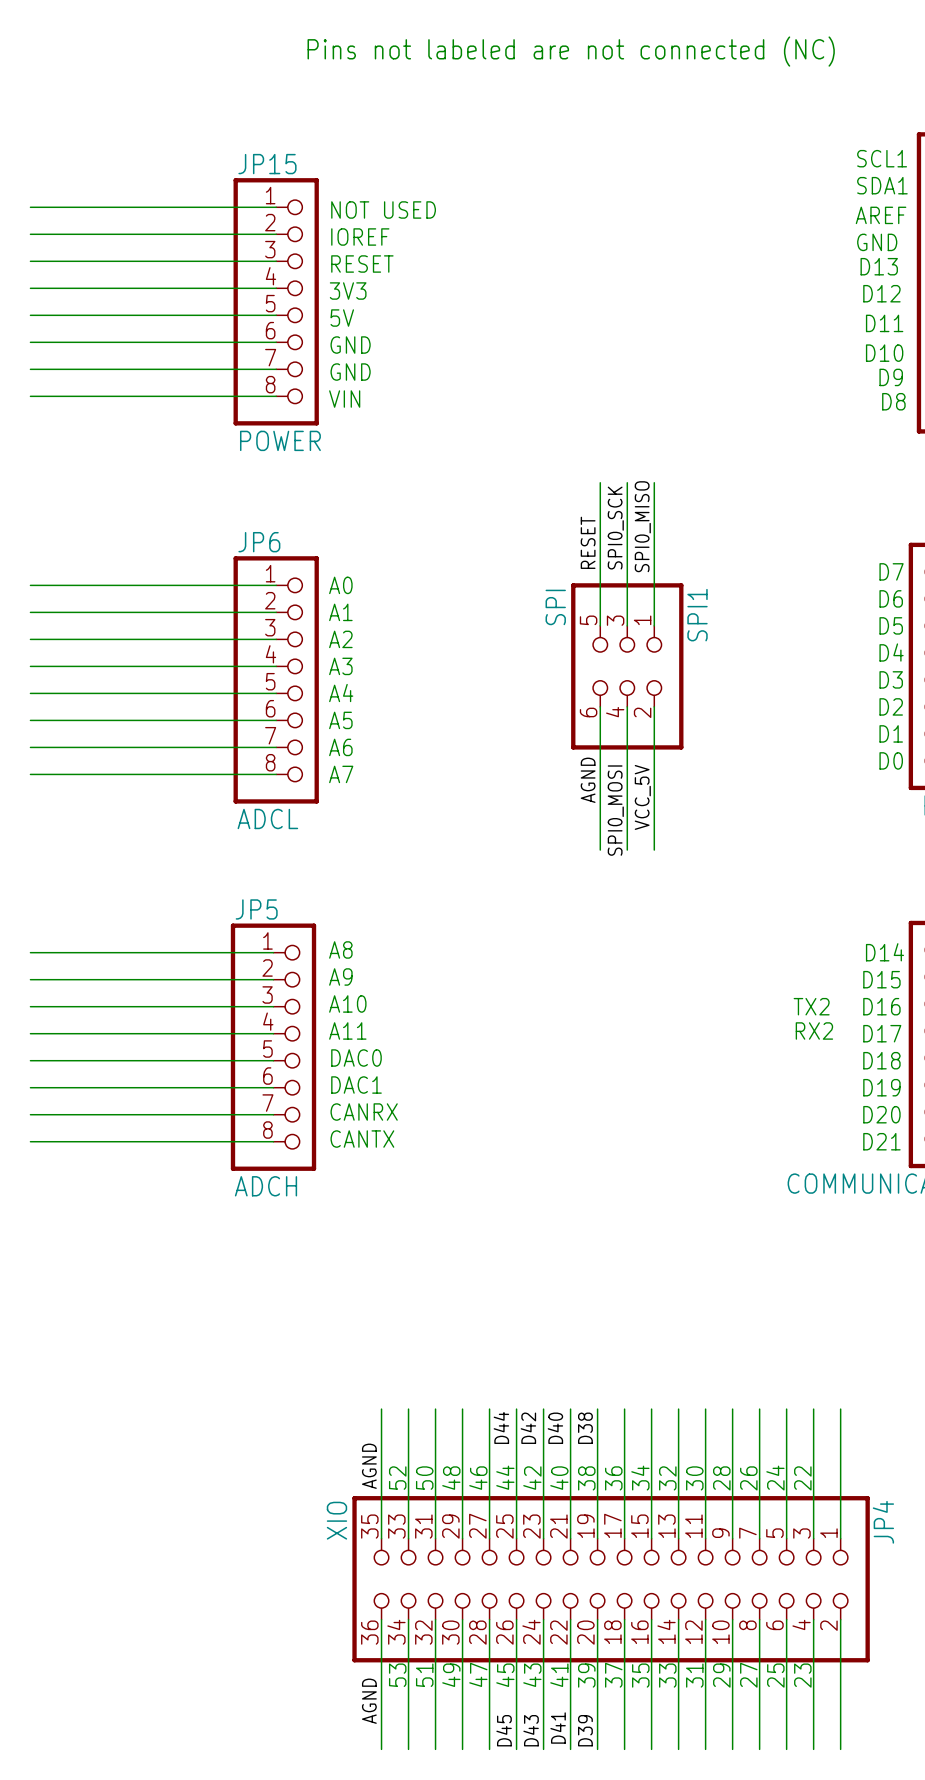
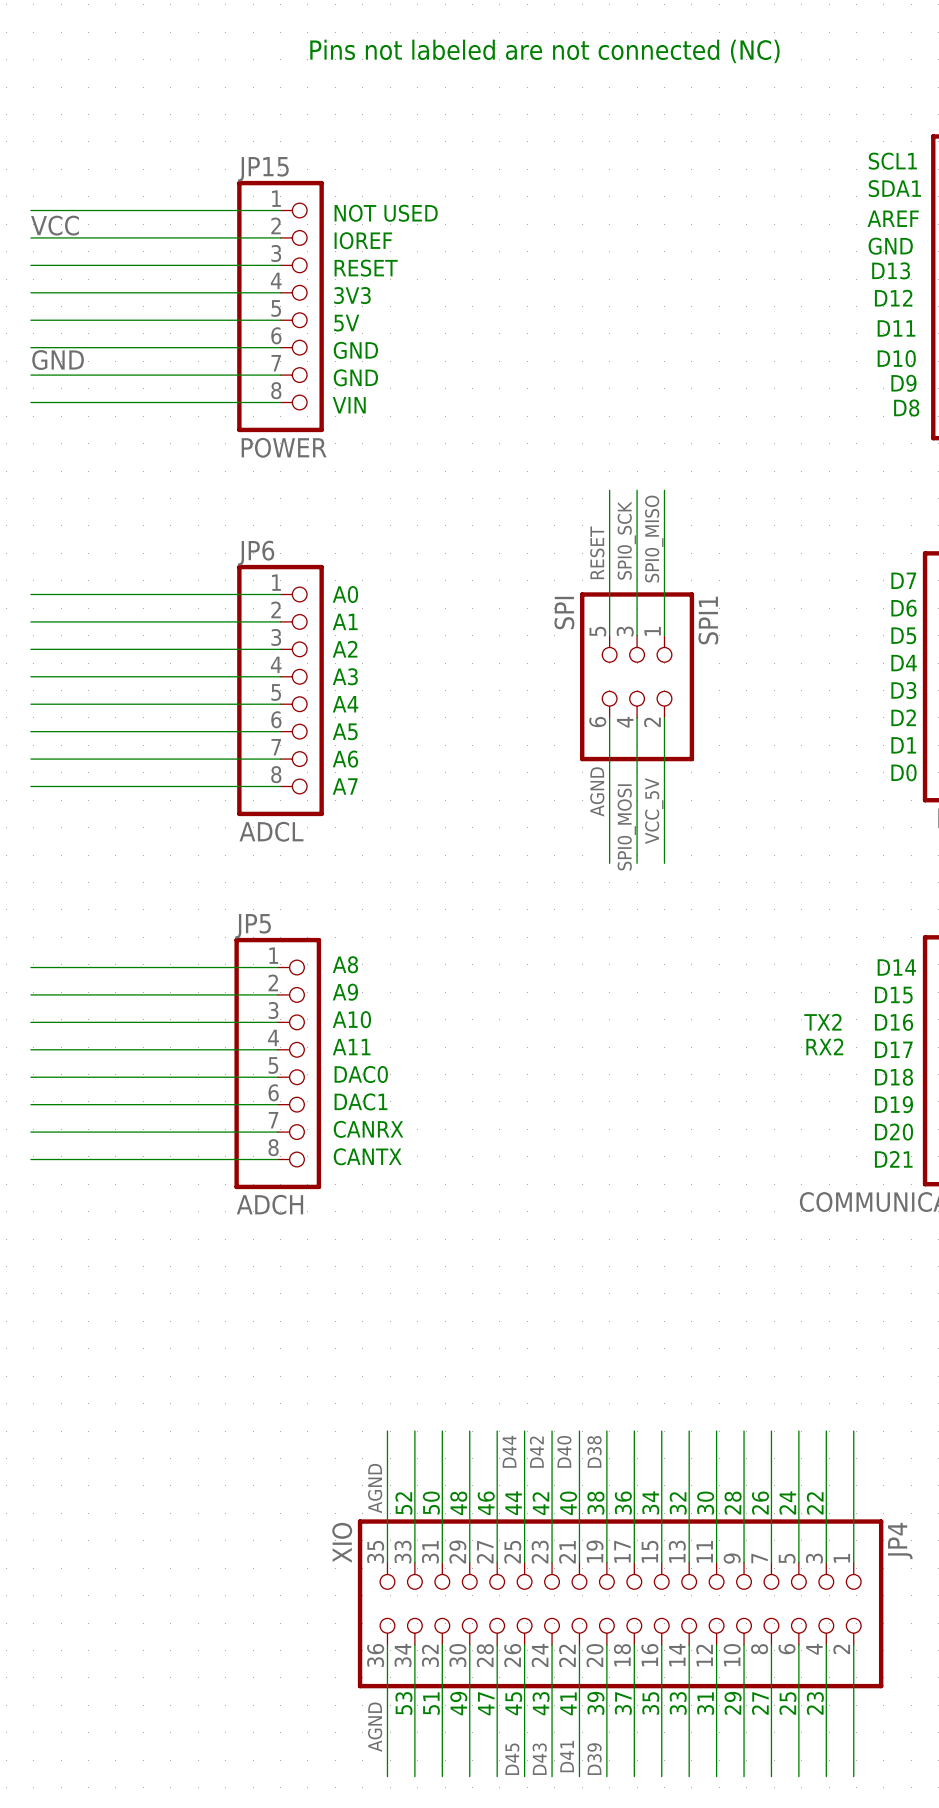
label: none -> VCC (55, 225)
label: none -> GND (58, 360)

